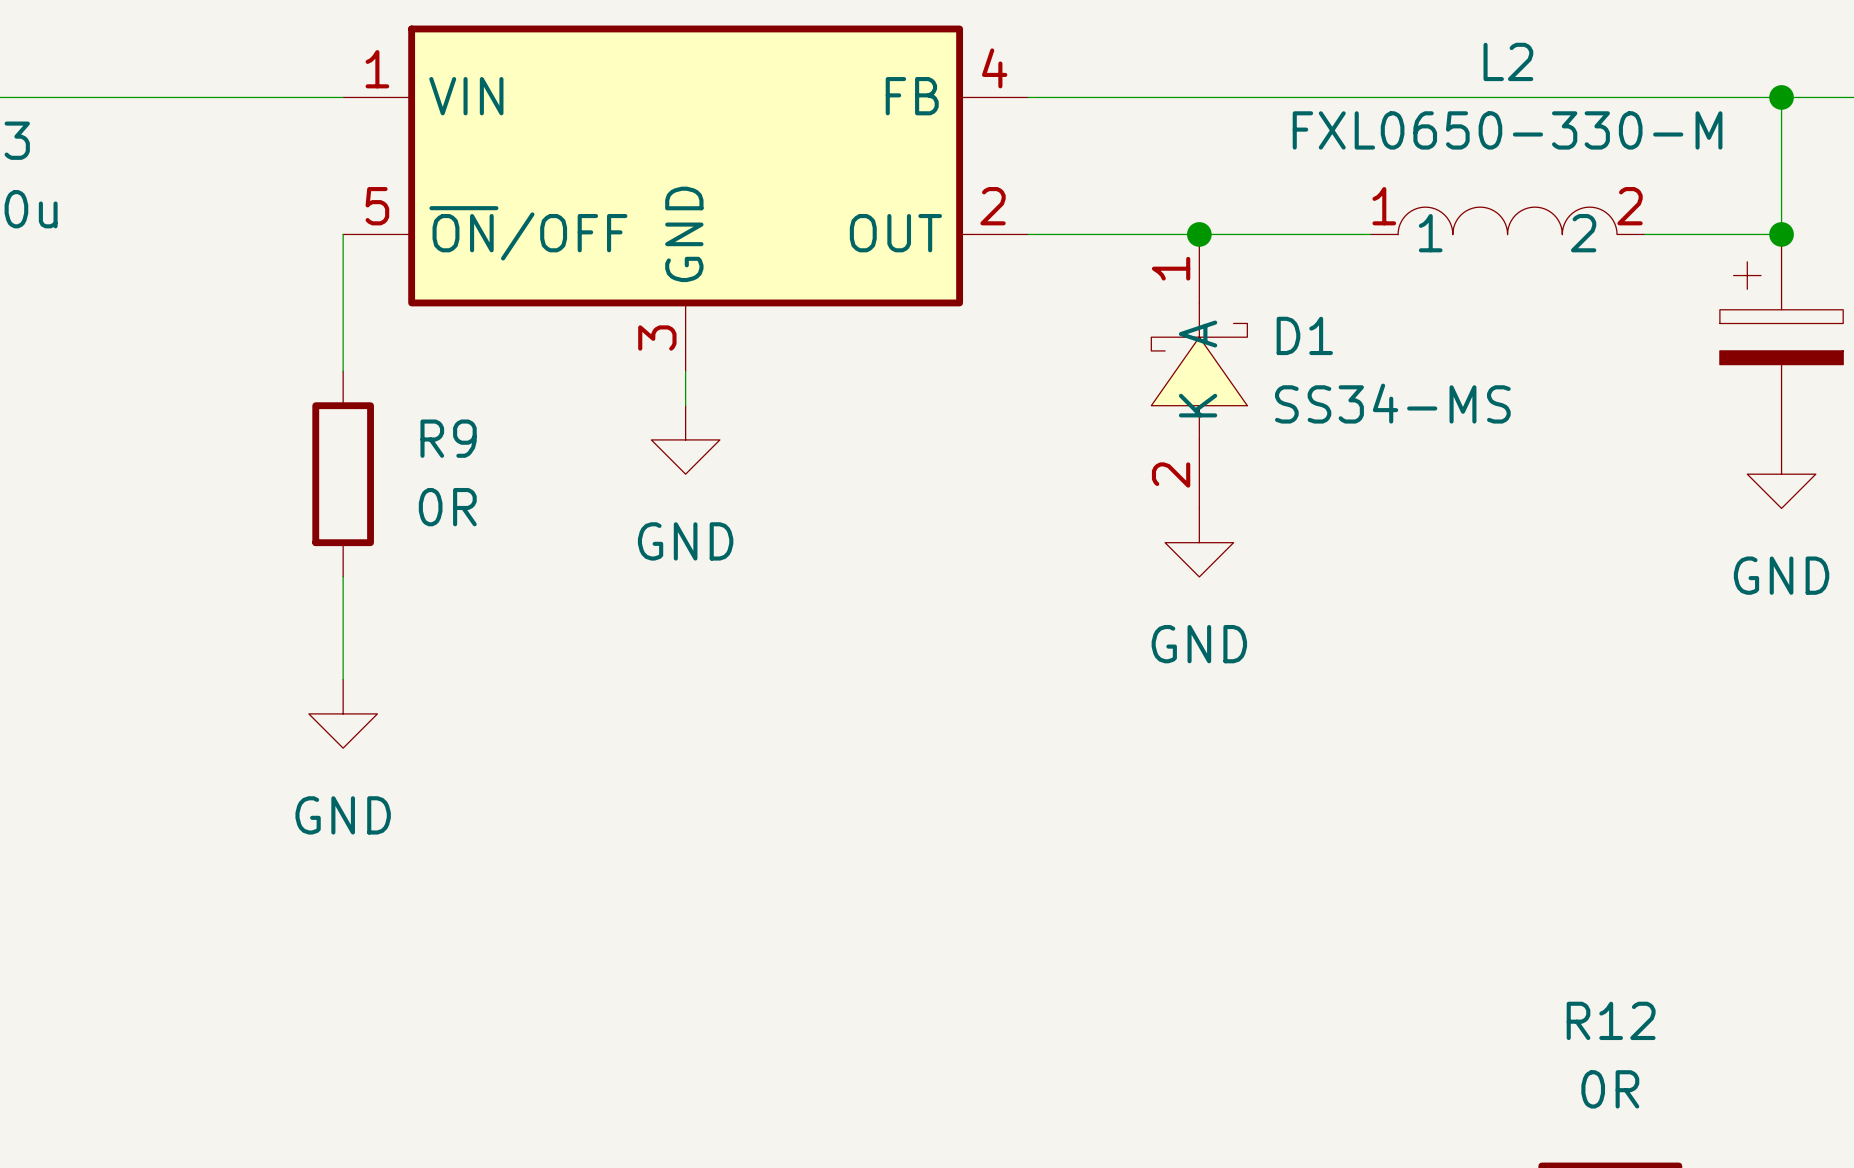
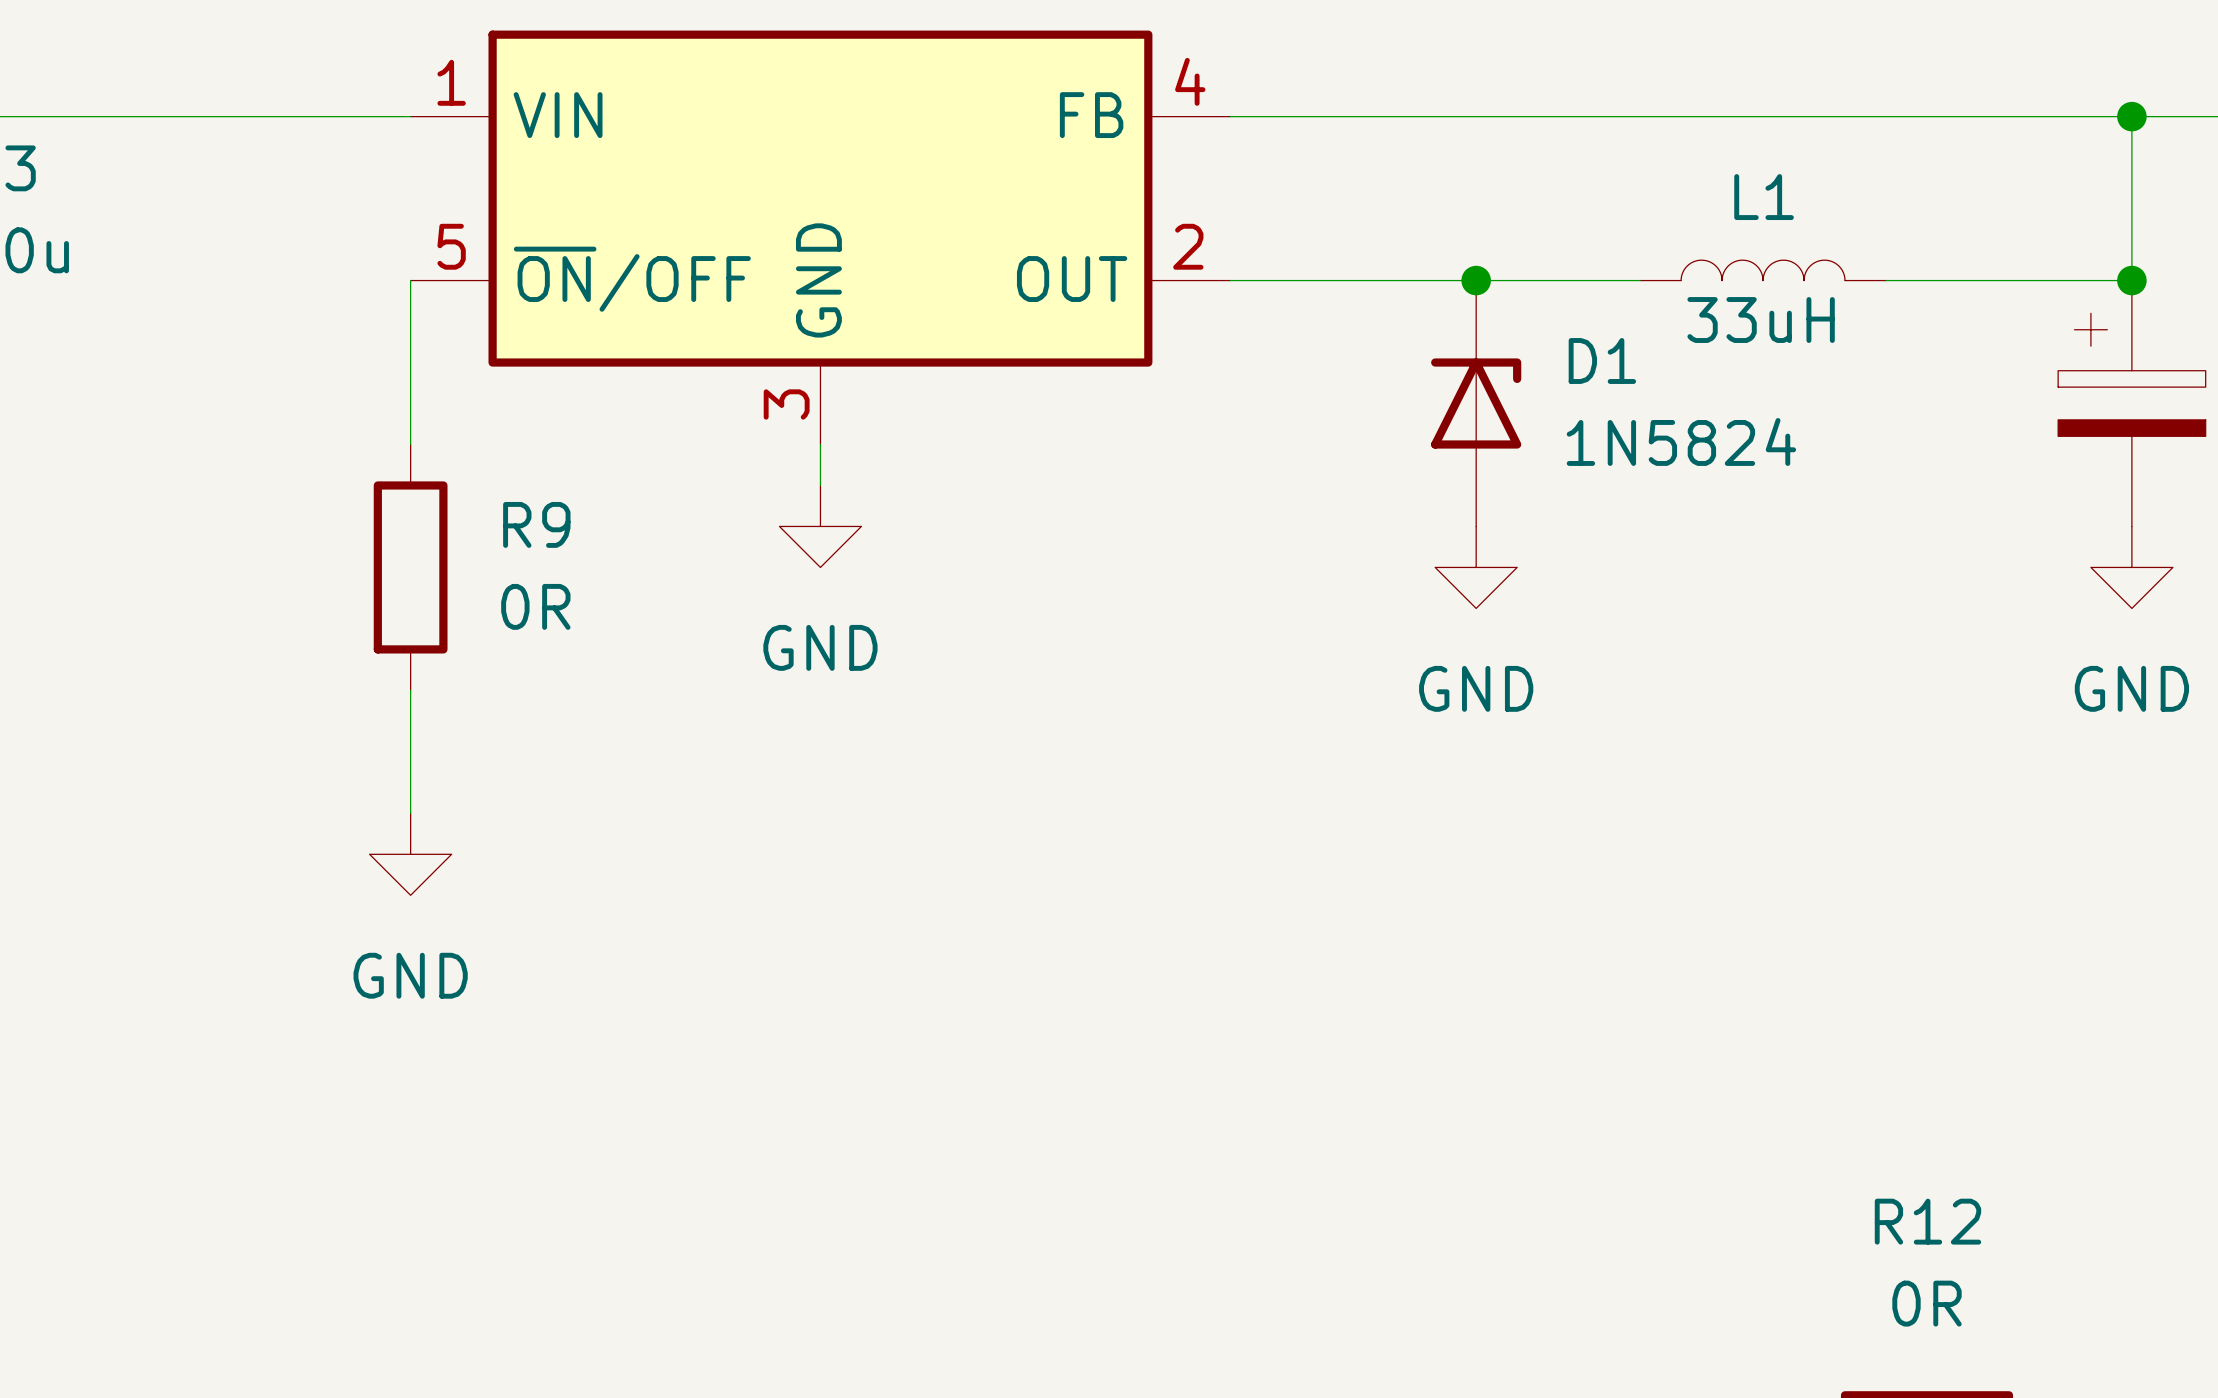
L2: FXL0650-330-M (1507, 220) -> none
L1: none -> 33uH (1763, 270)
D1 symbol: [1151, 234, 1248, 509] -> [1431, 280, 1522, 527]
junction position: (1199, 234) -> (1476, 280)
wire: none -> (1886, 280) (1967, 280)
D1 value: SS34-MS (1392, 403) -> 1N5824 (1681, 441)
power symbol position: GND (1199, 542) -> GND (1476, 567)

